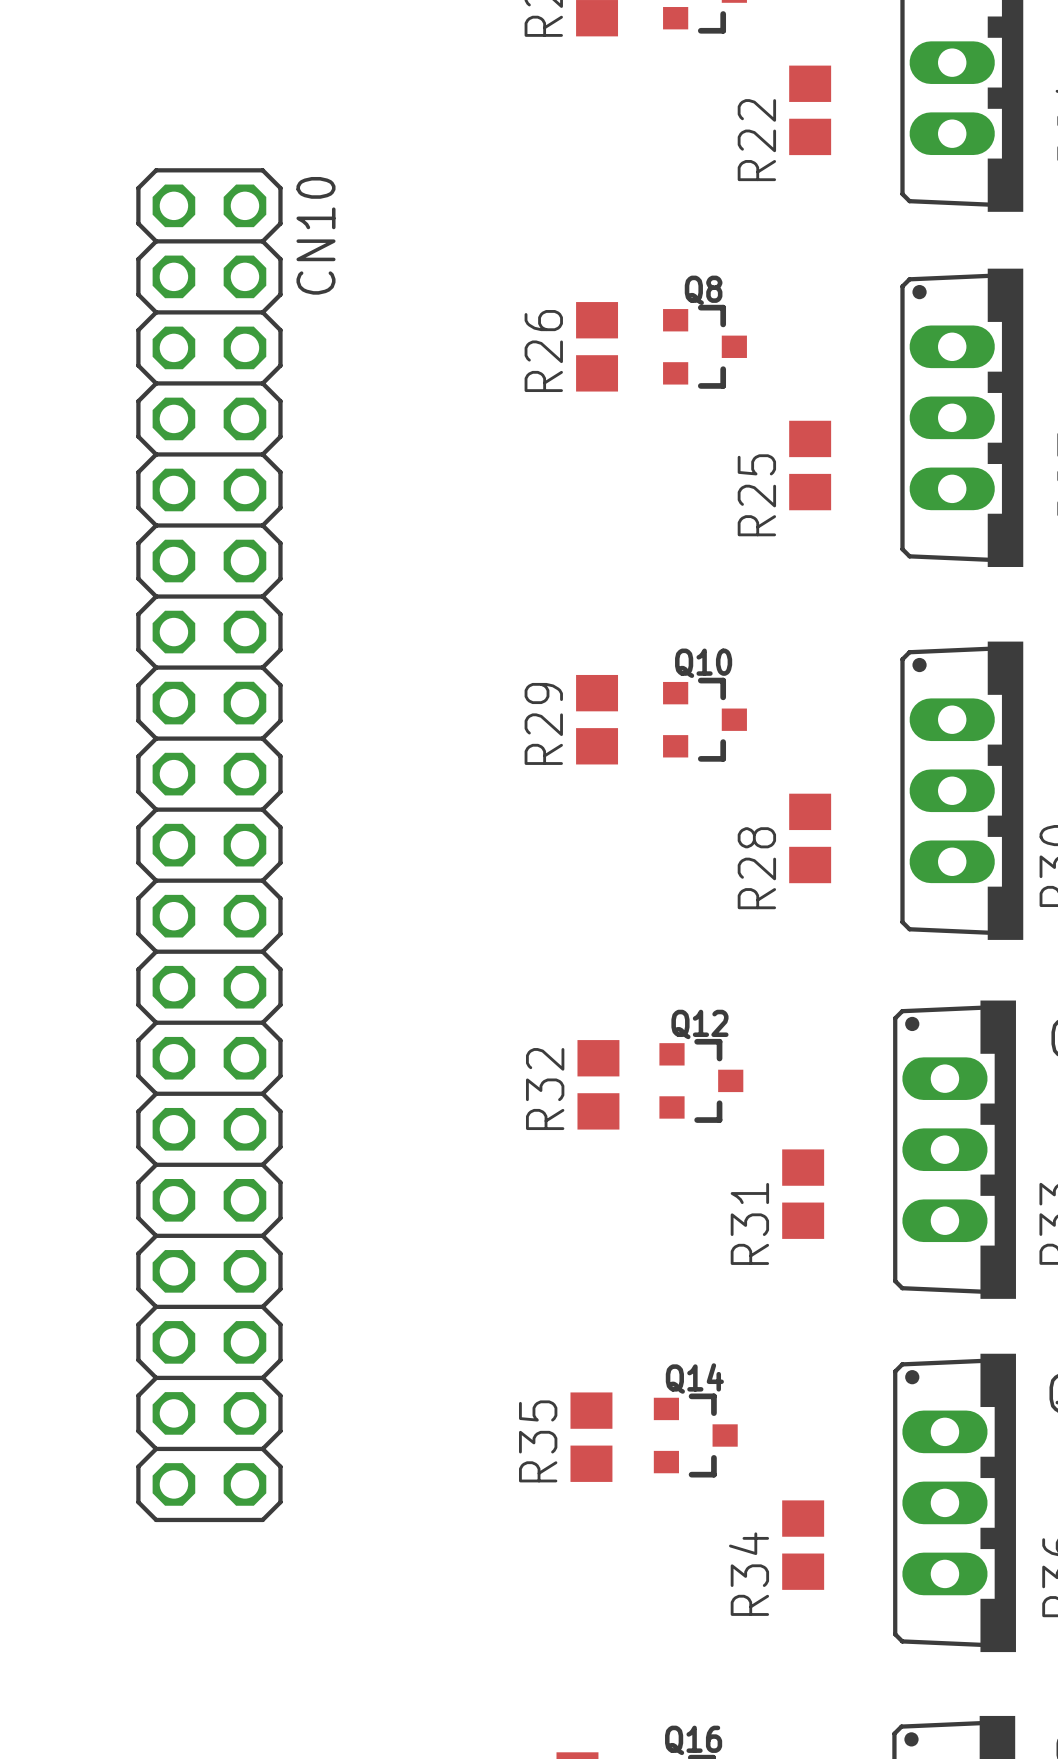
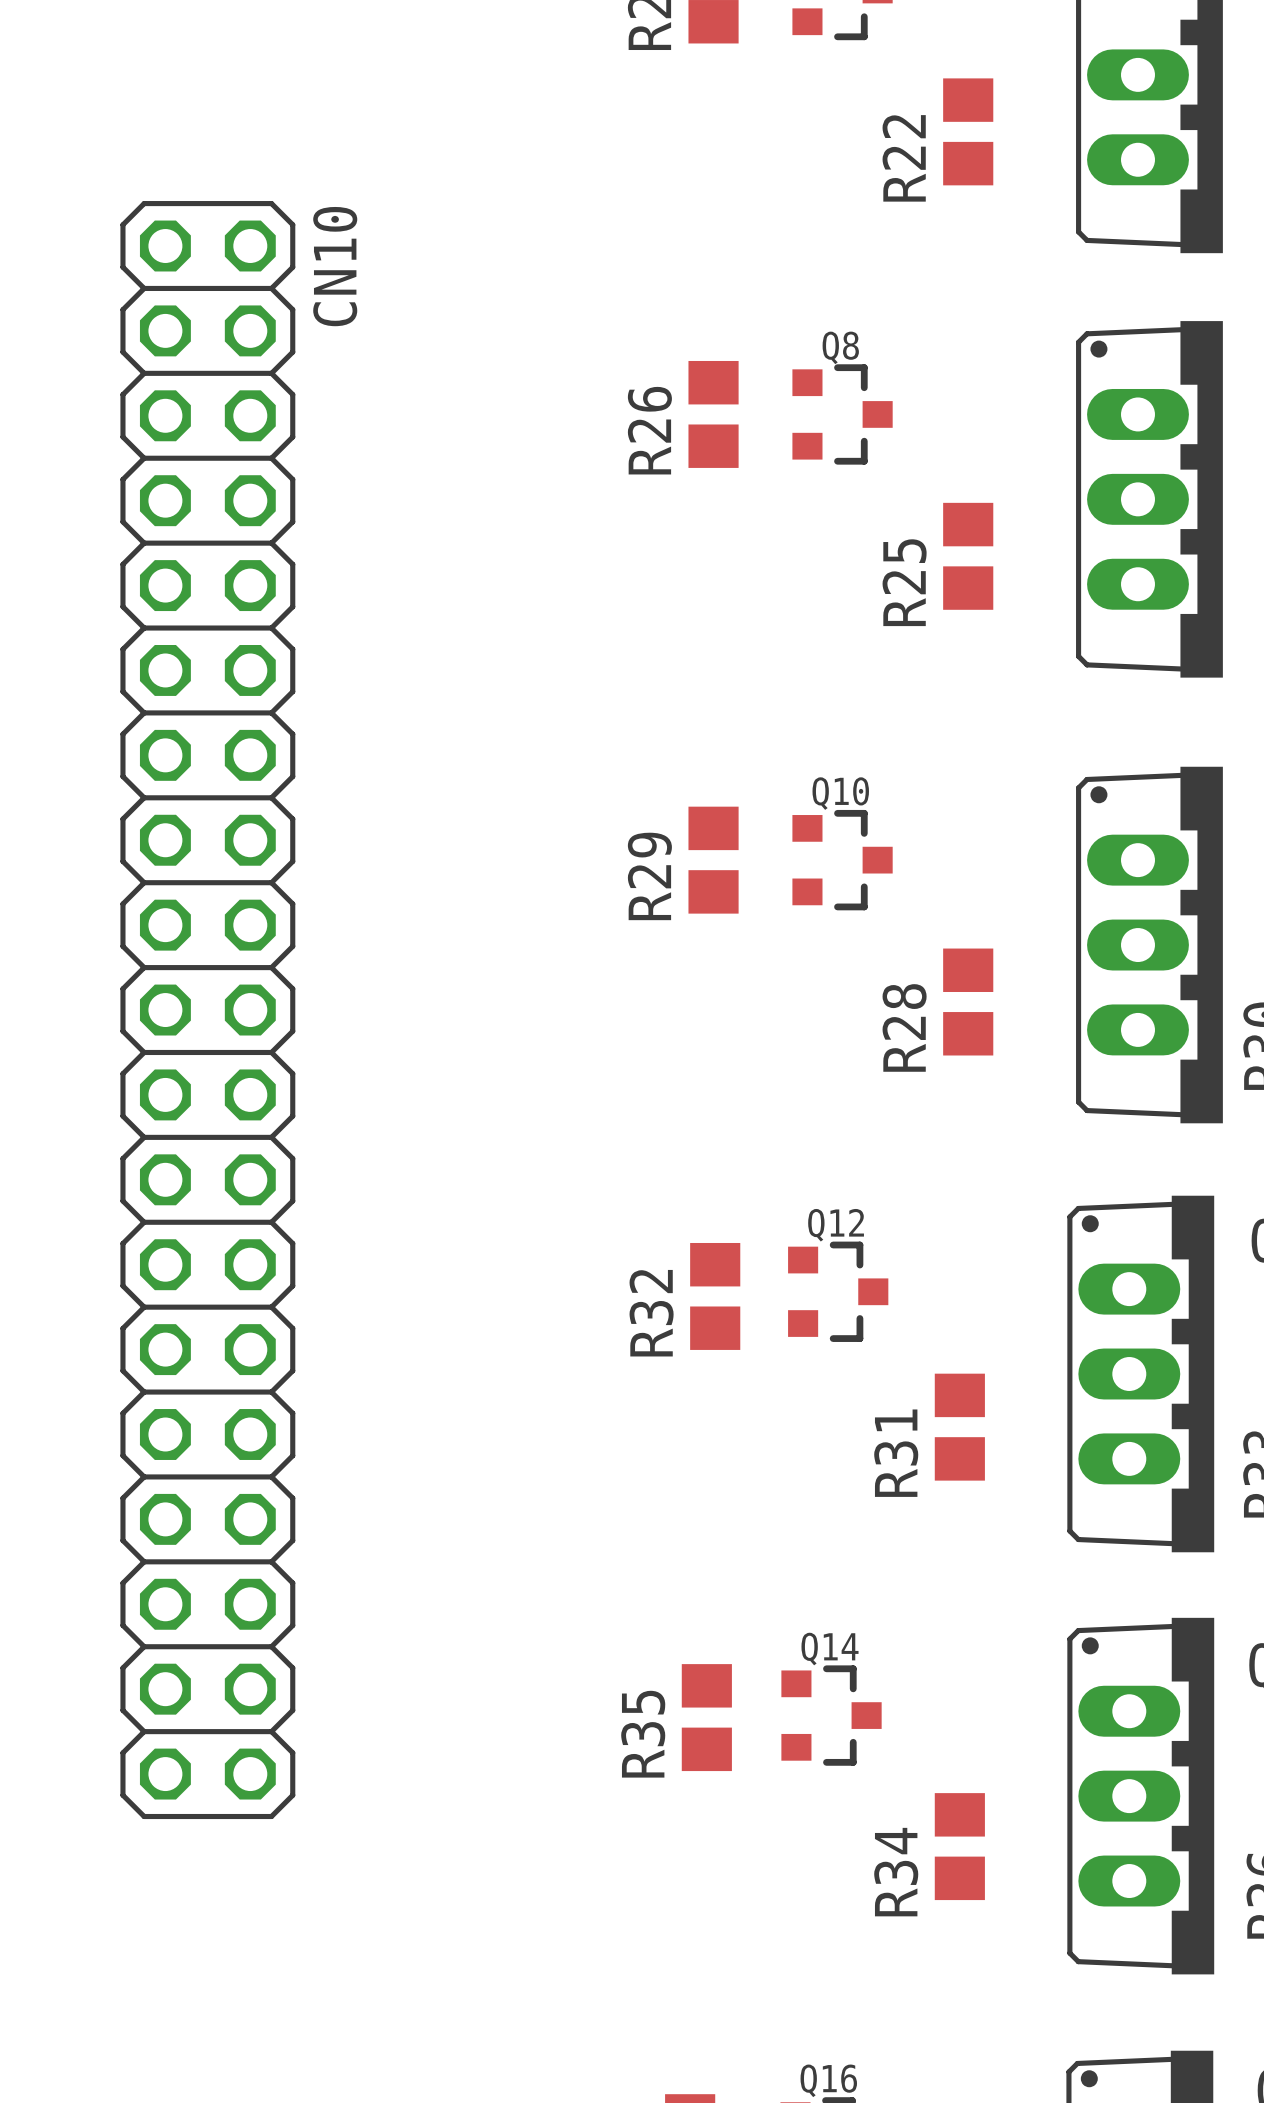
CN10 position: (209, 845) -> (207, 1010)

